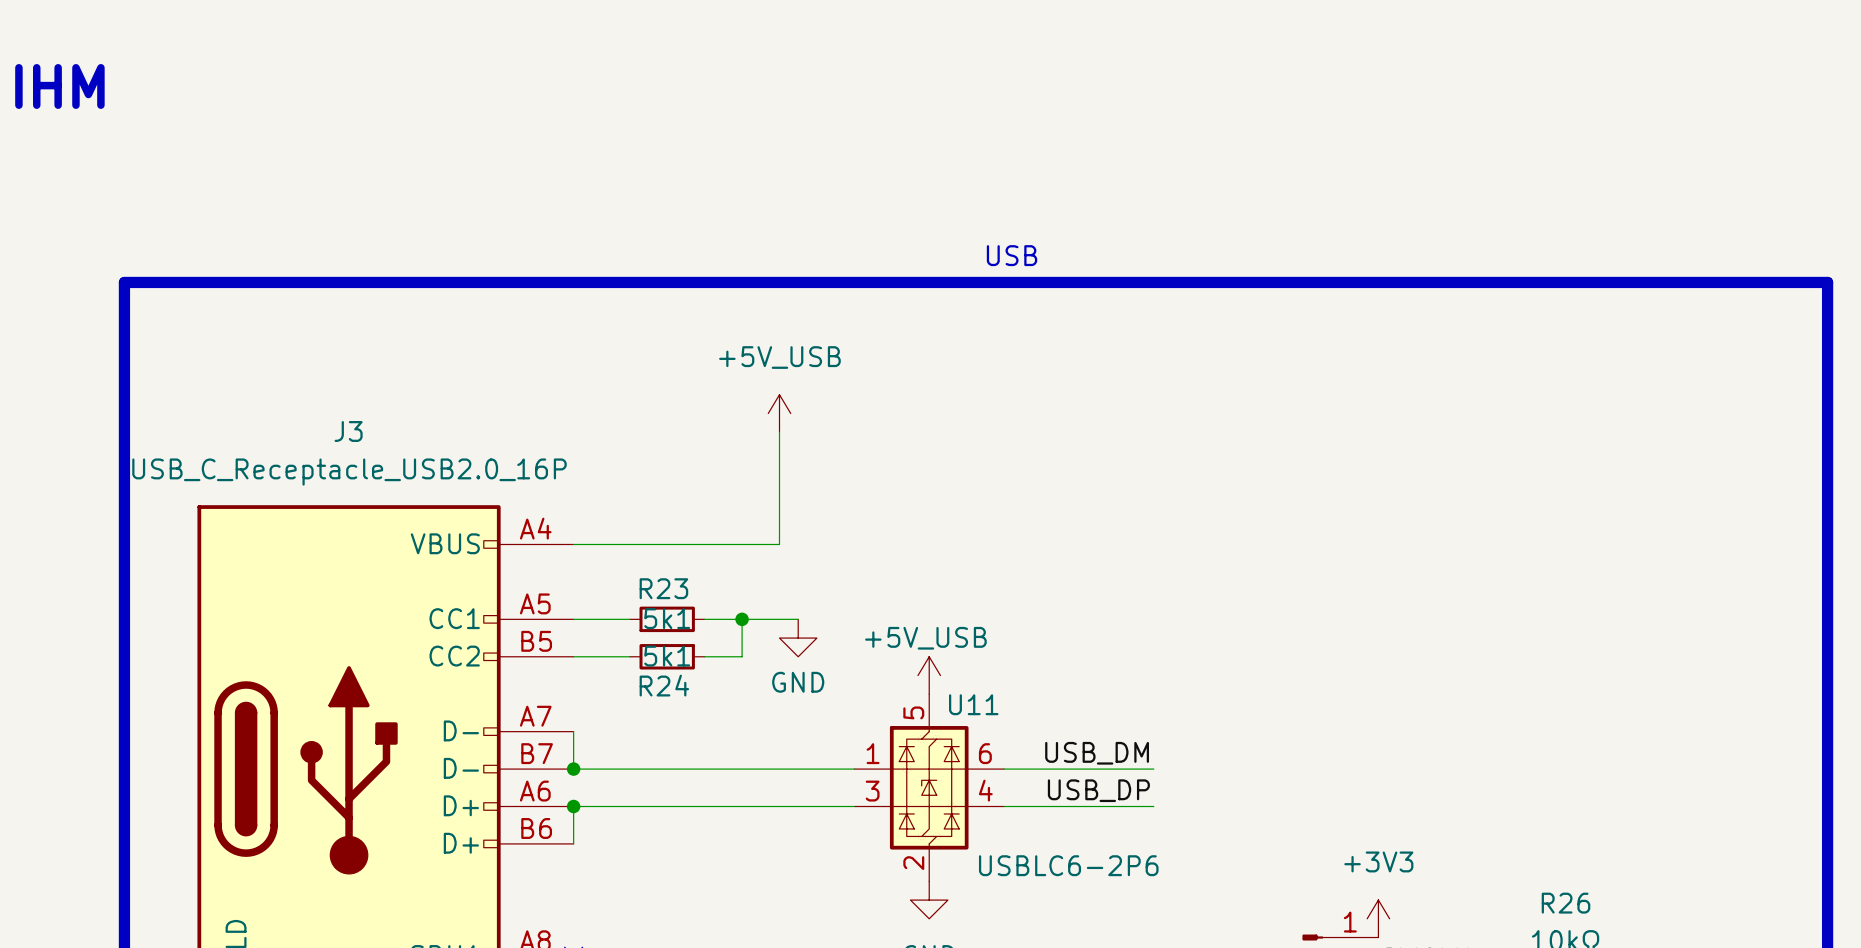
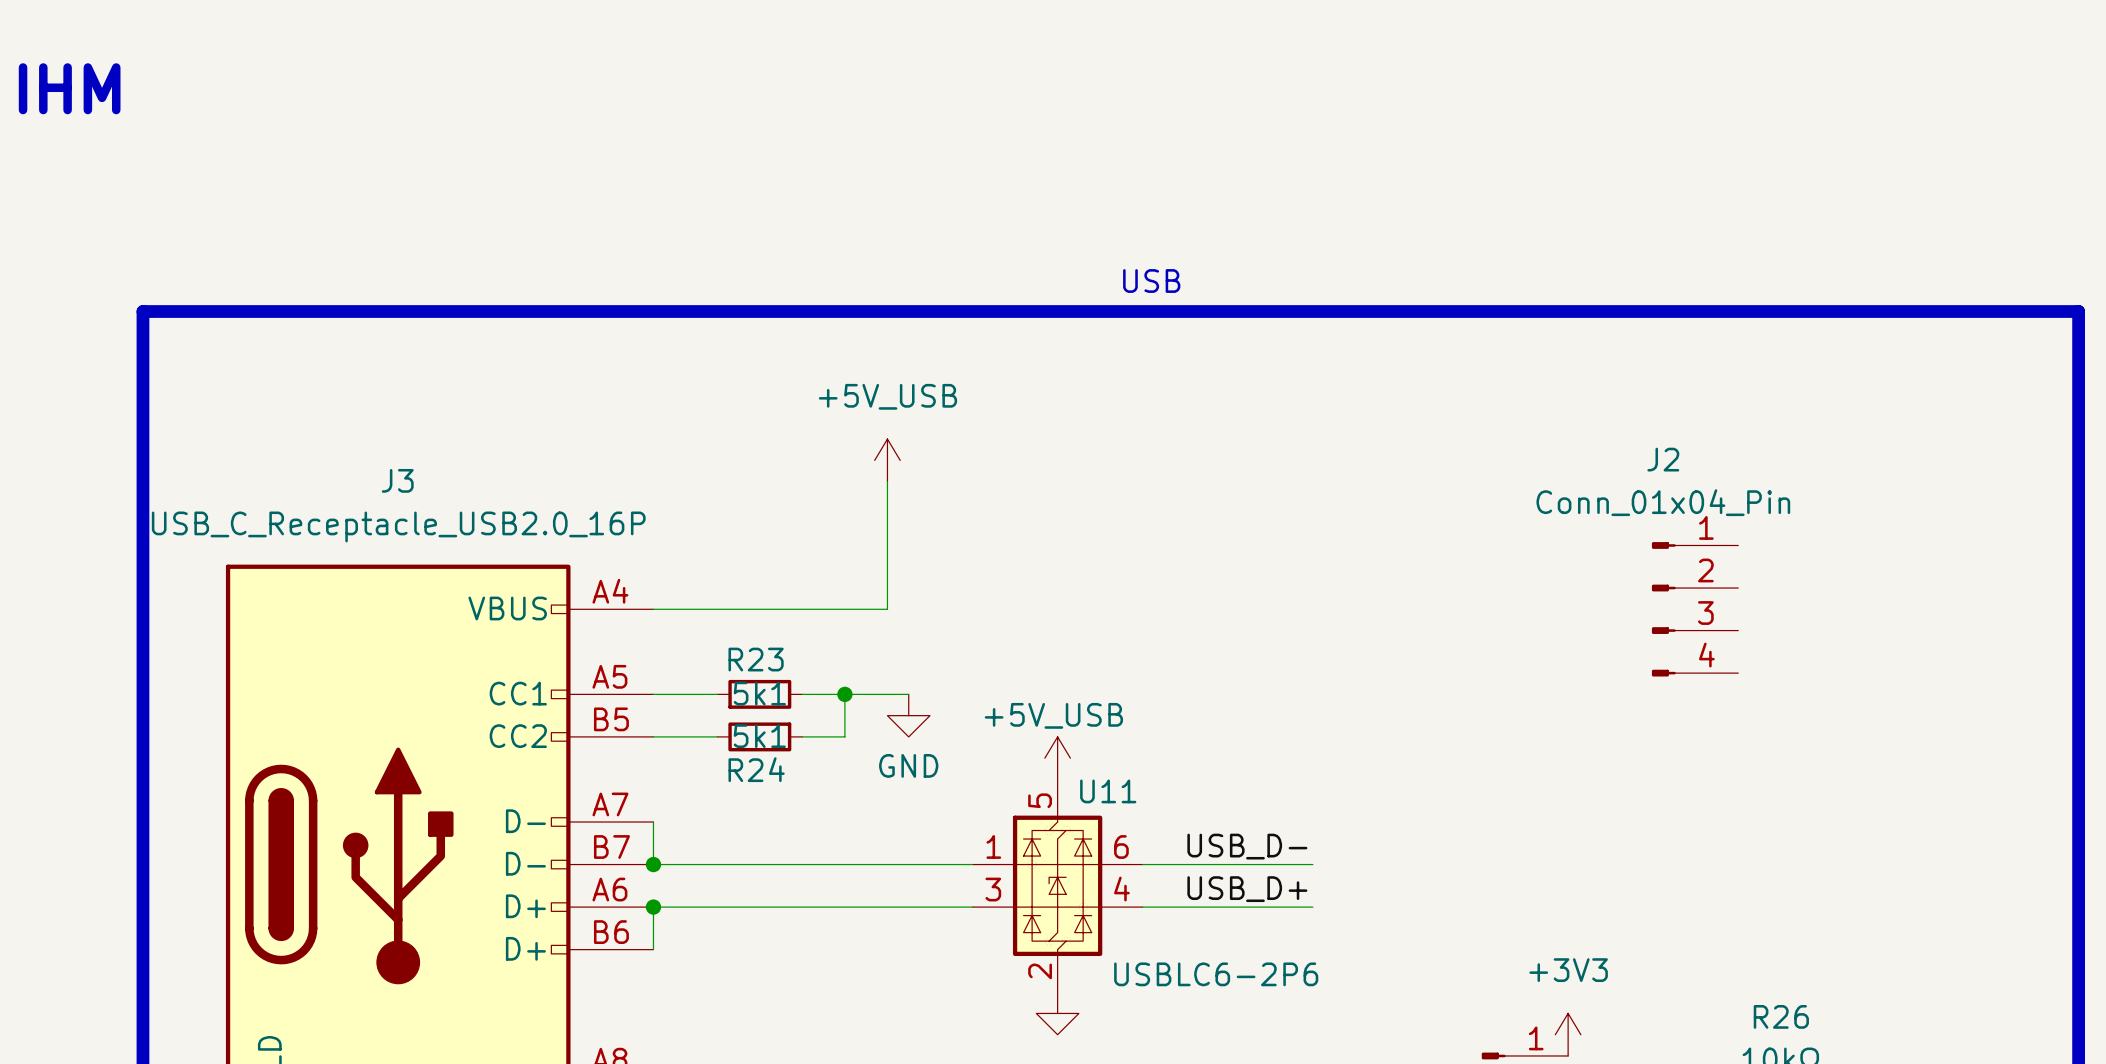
J2: none -> Conn_01x04_Pin (1695, 609)
label: USB_DM (1097, 753) -> USB_D- (1247, 846)
label: USB_DP (1098, 790) -> USB_D+ (1247, 889)

